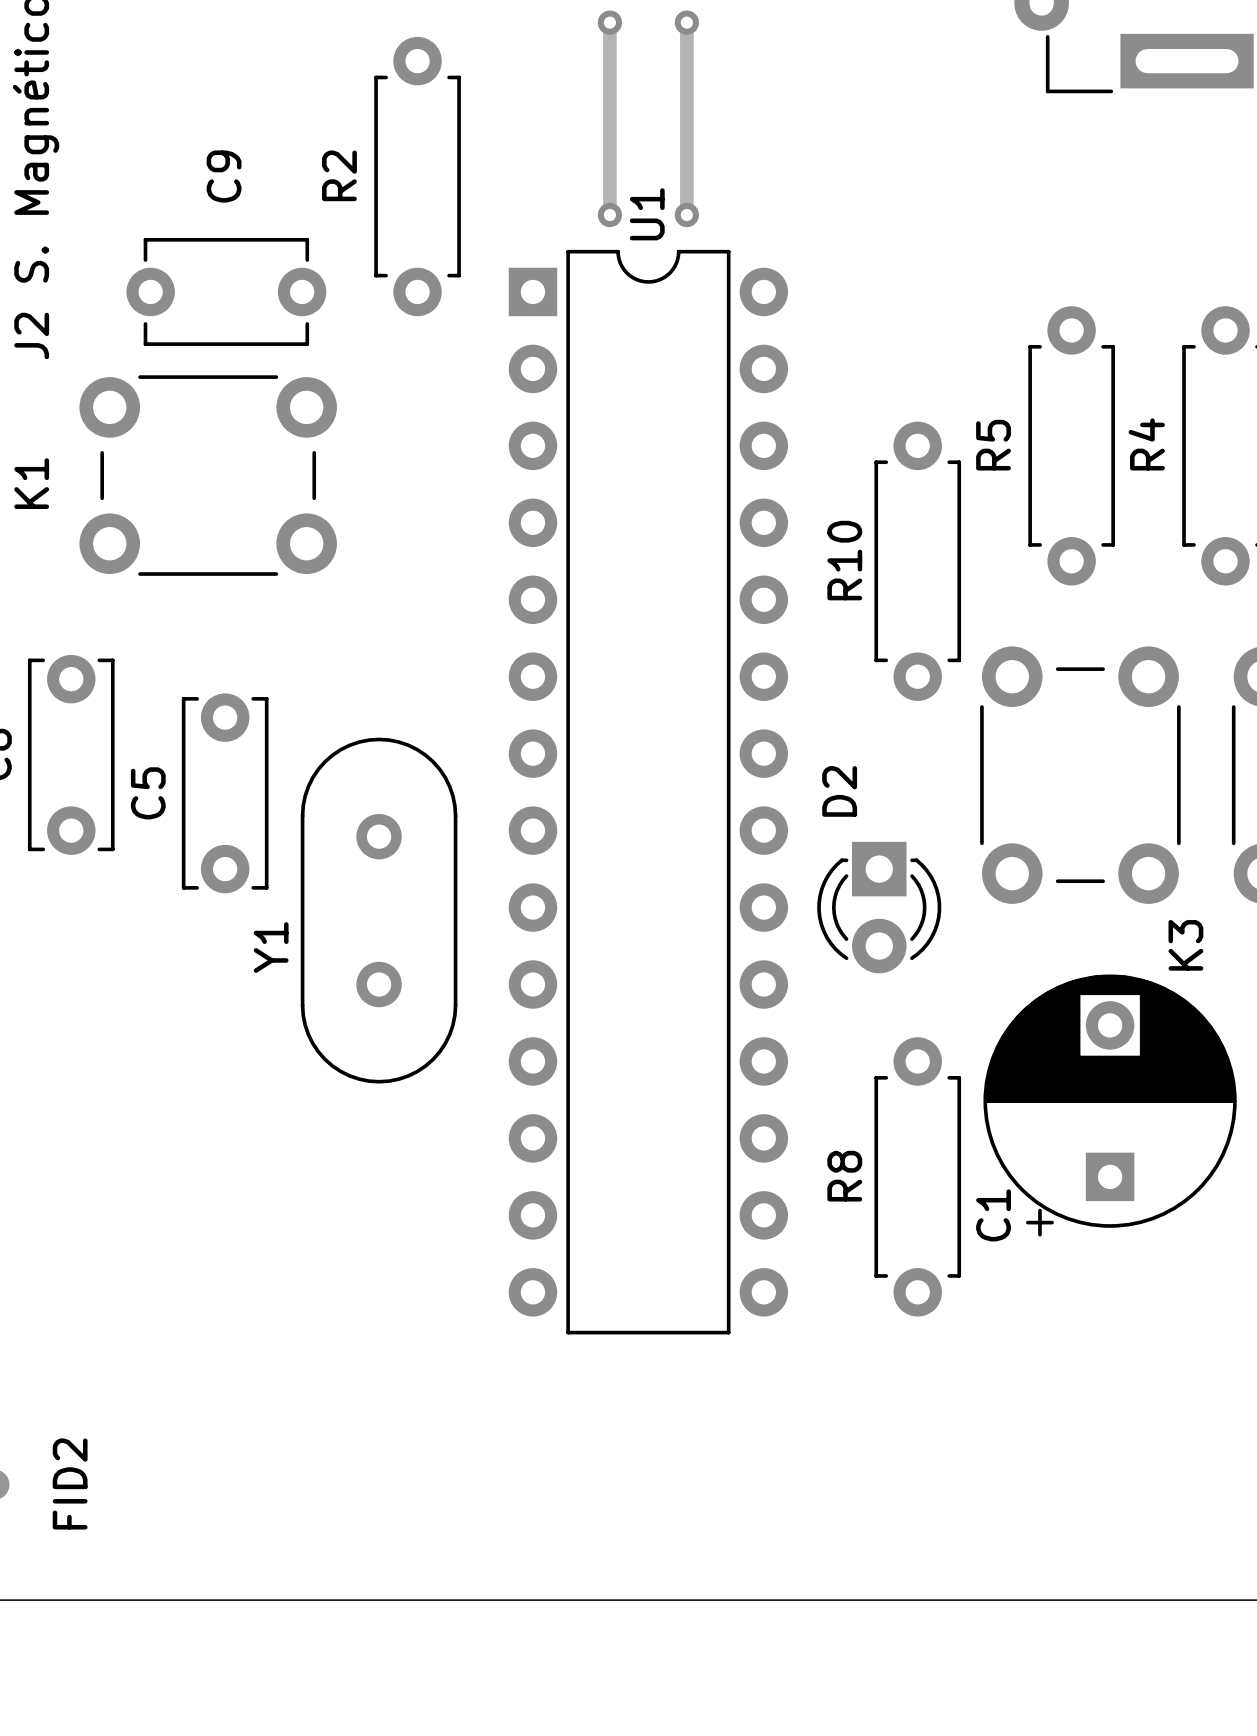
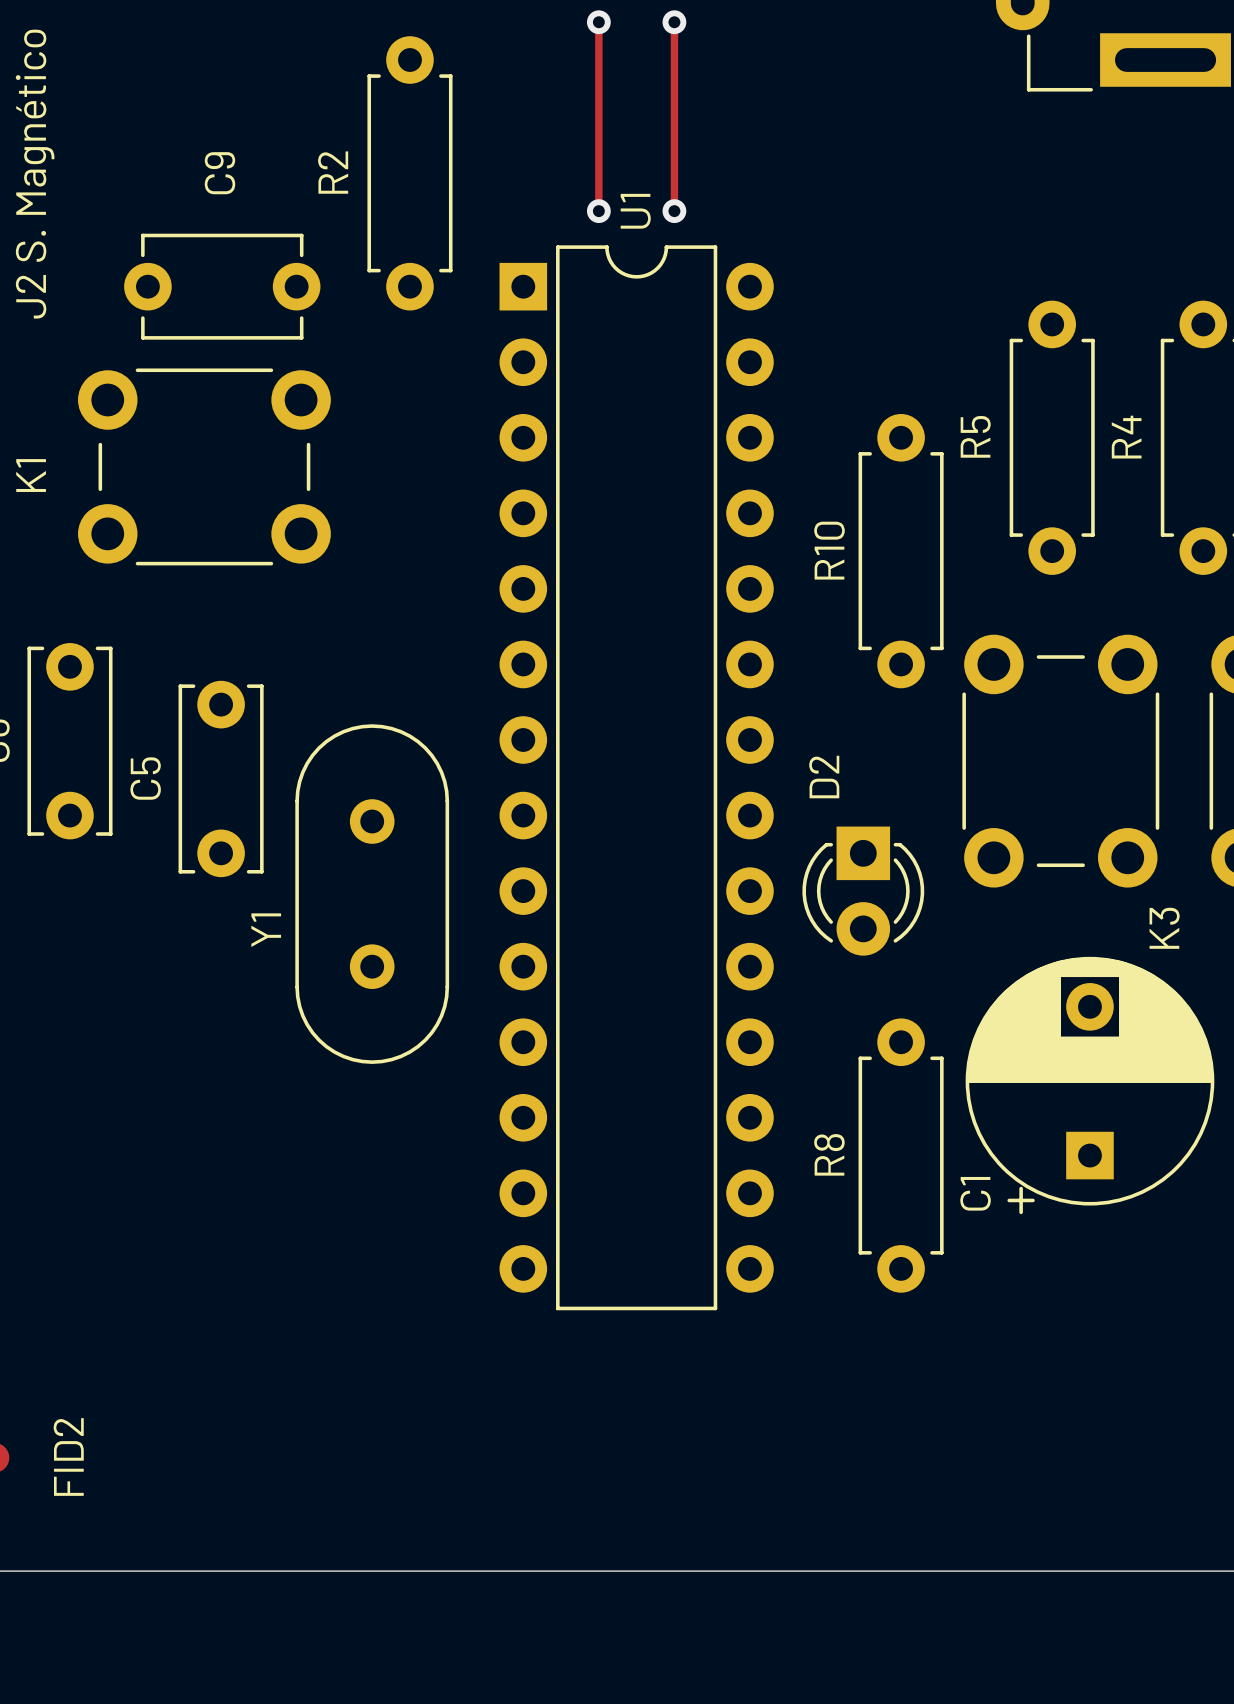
track width: thick (609, 22) (609, 215) -> thin (598, 22) (598, 211)
track width: thick (686, 22) (686, 215) -> thin (674, 22) (674, 211)

